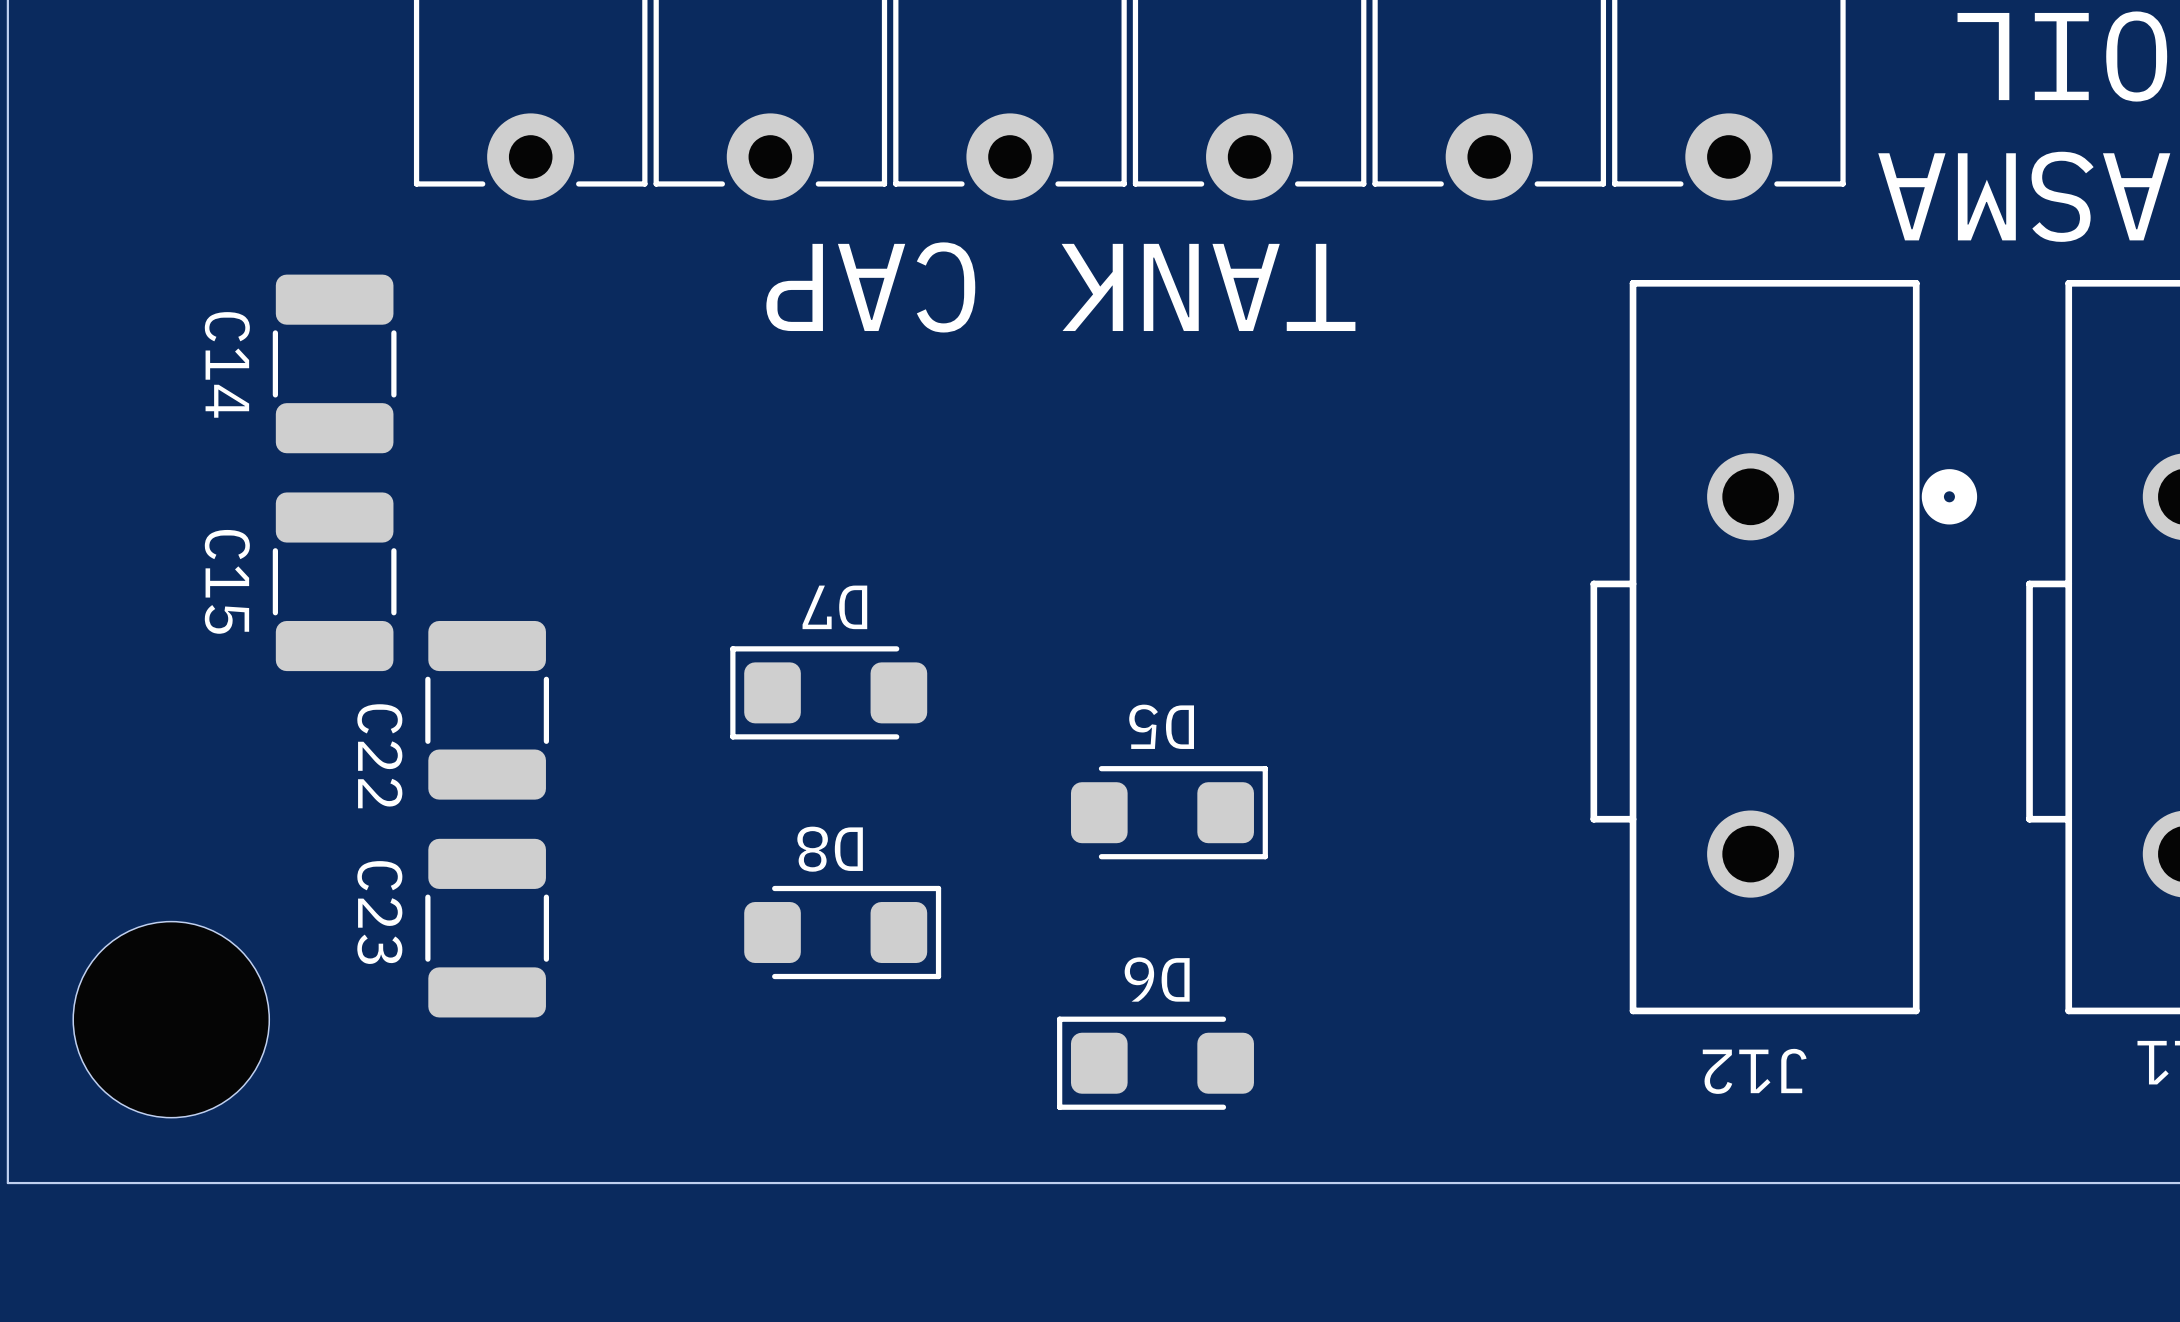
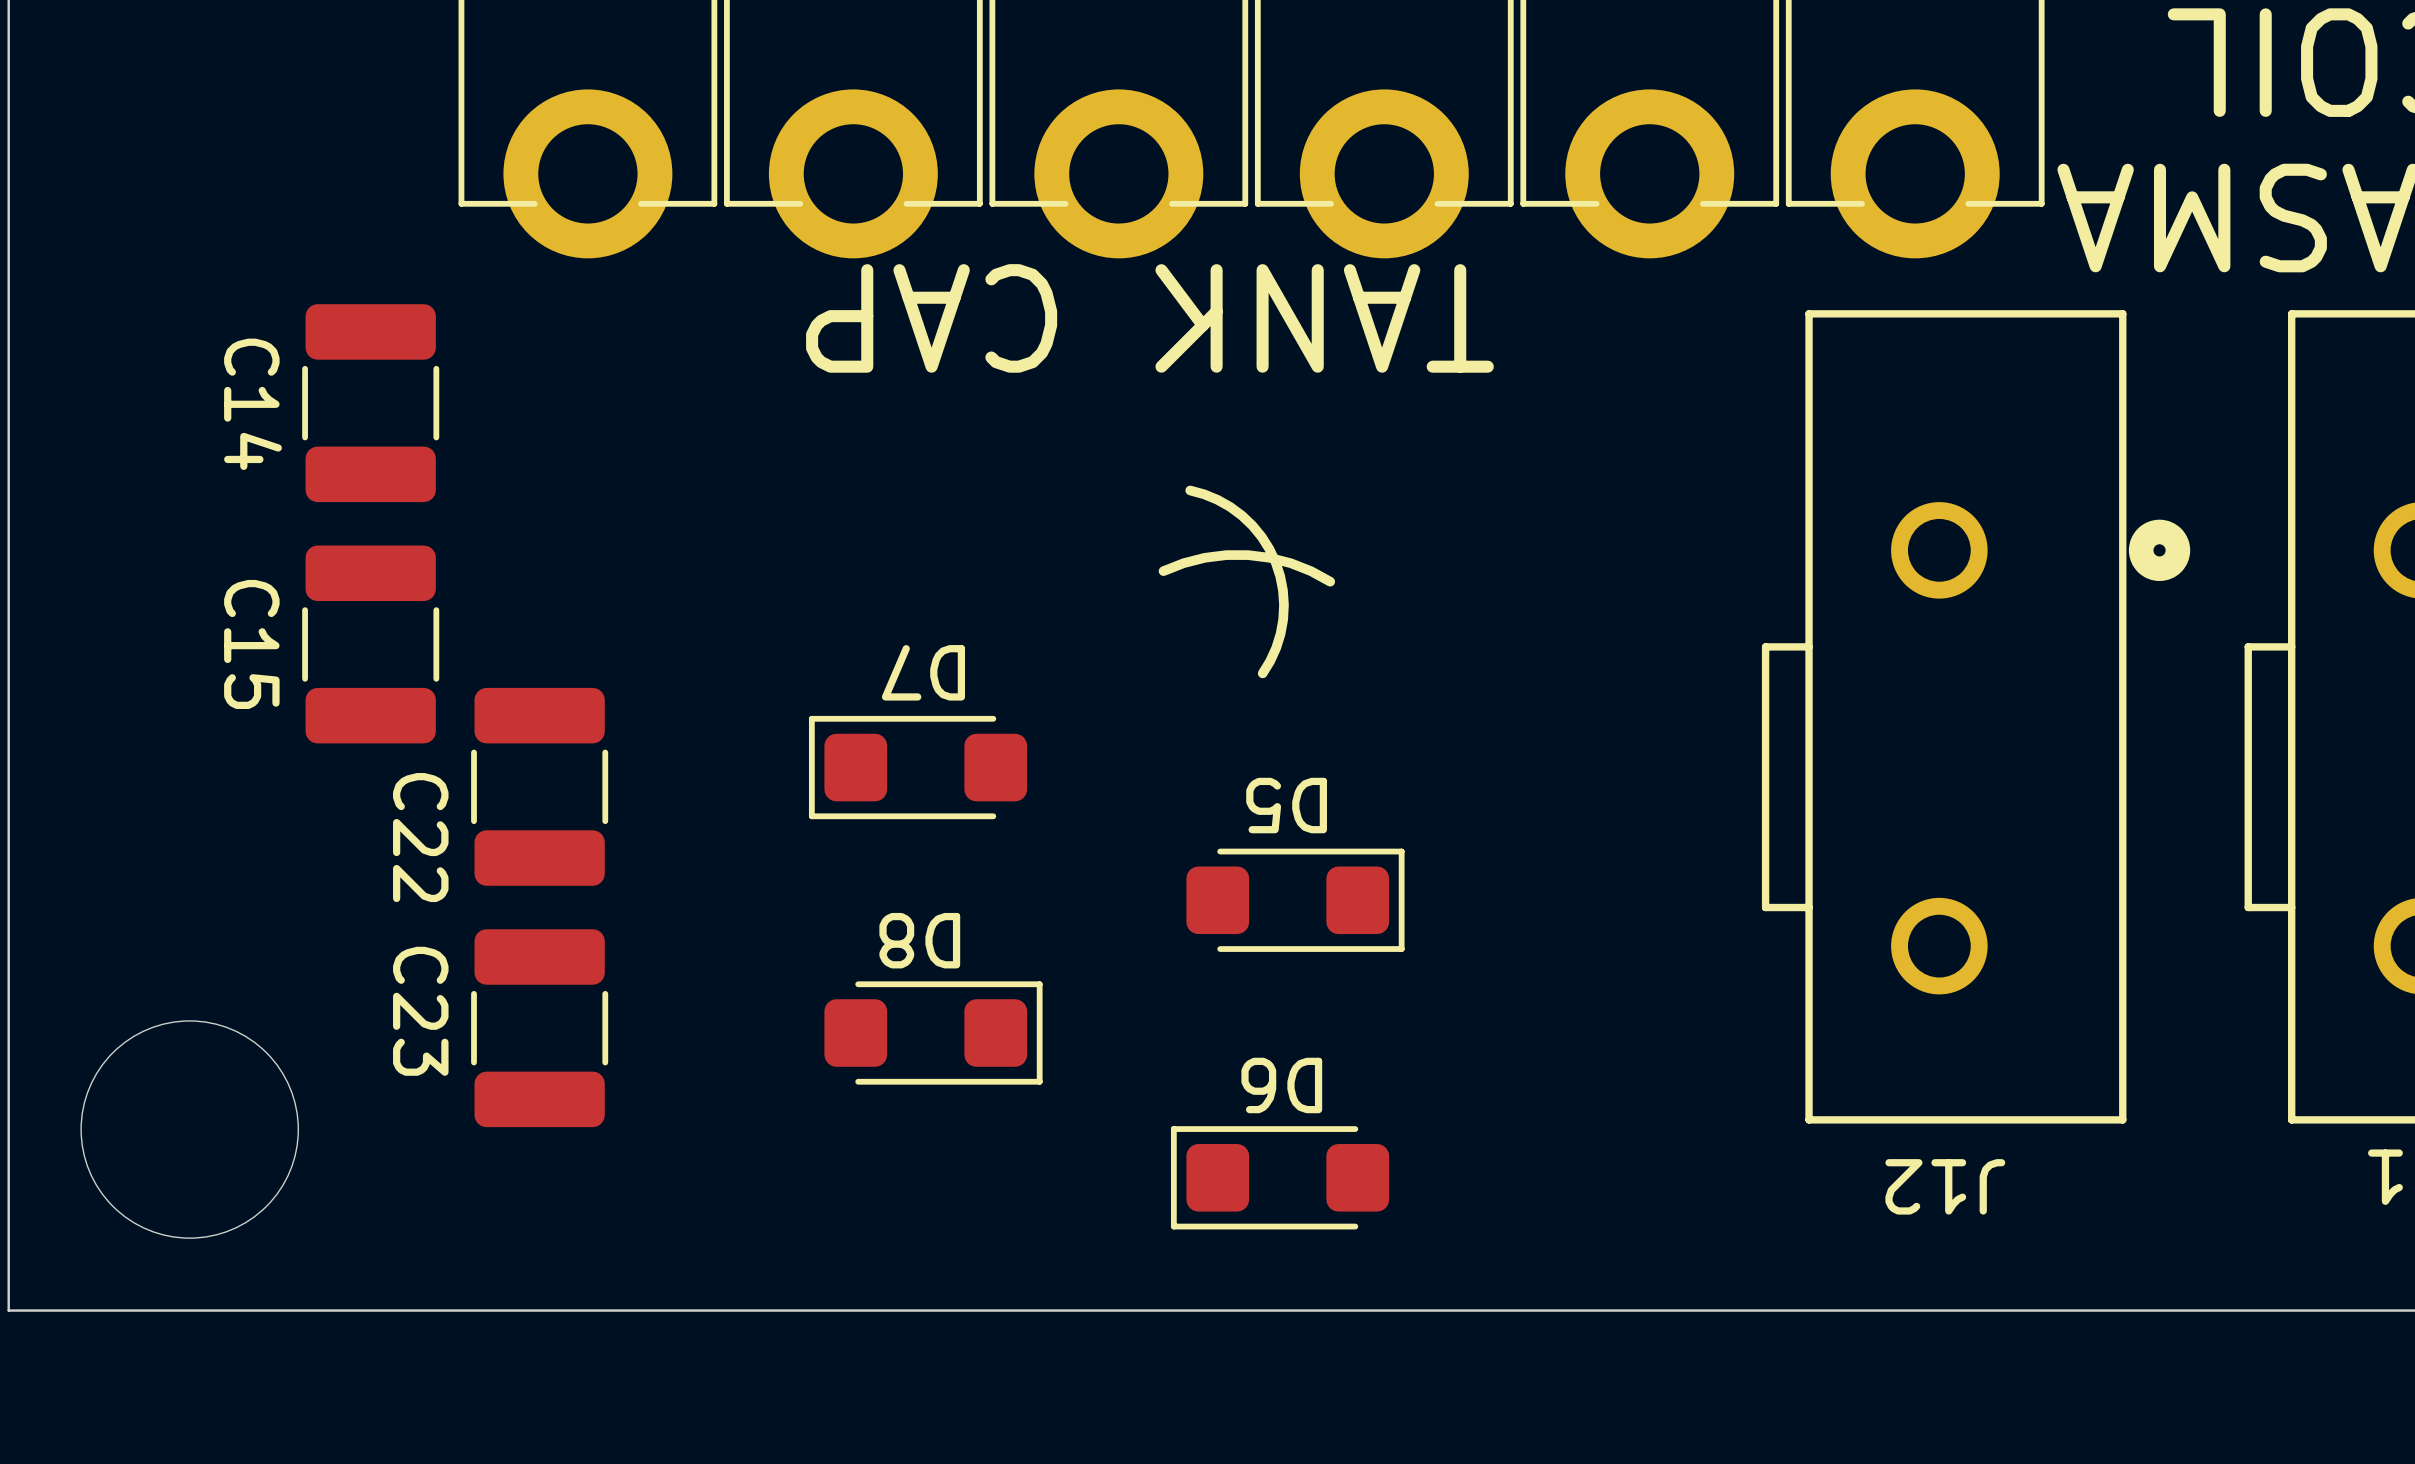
part: none -> (587, 173)
part: none -> (853, 173)
part: none -> (1118, 173)
part: none -> (1384, 173)
part: none -> (1649, 173)
part: none -> (1915, 173)
line: none -> (1190, 490) (1217, 499) (1242, 515) (1261, 536) (1275, 562) (1282, 590) (1283, 619) (1276, 647) (1262, 673)
line: none -> (1163, 571) (1204, 557) (1248, 555) (1290, 563) (1330, 581)

